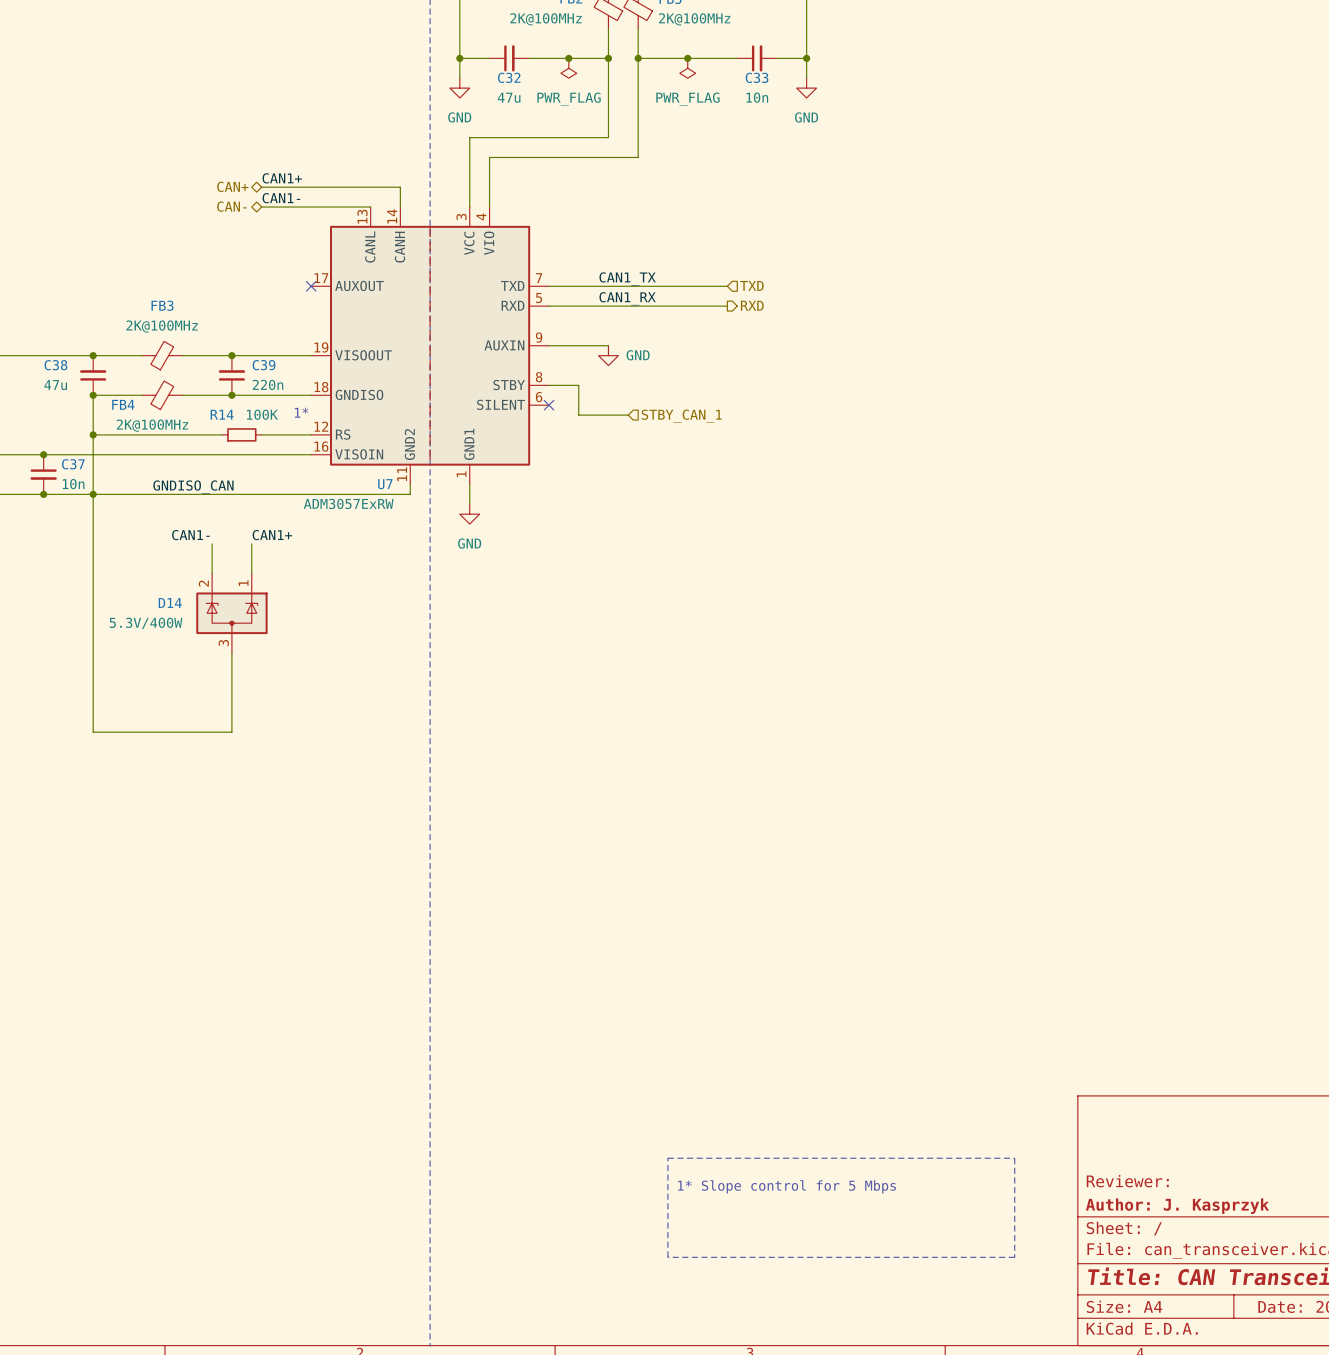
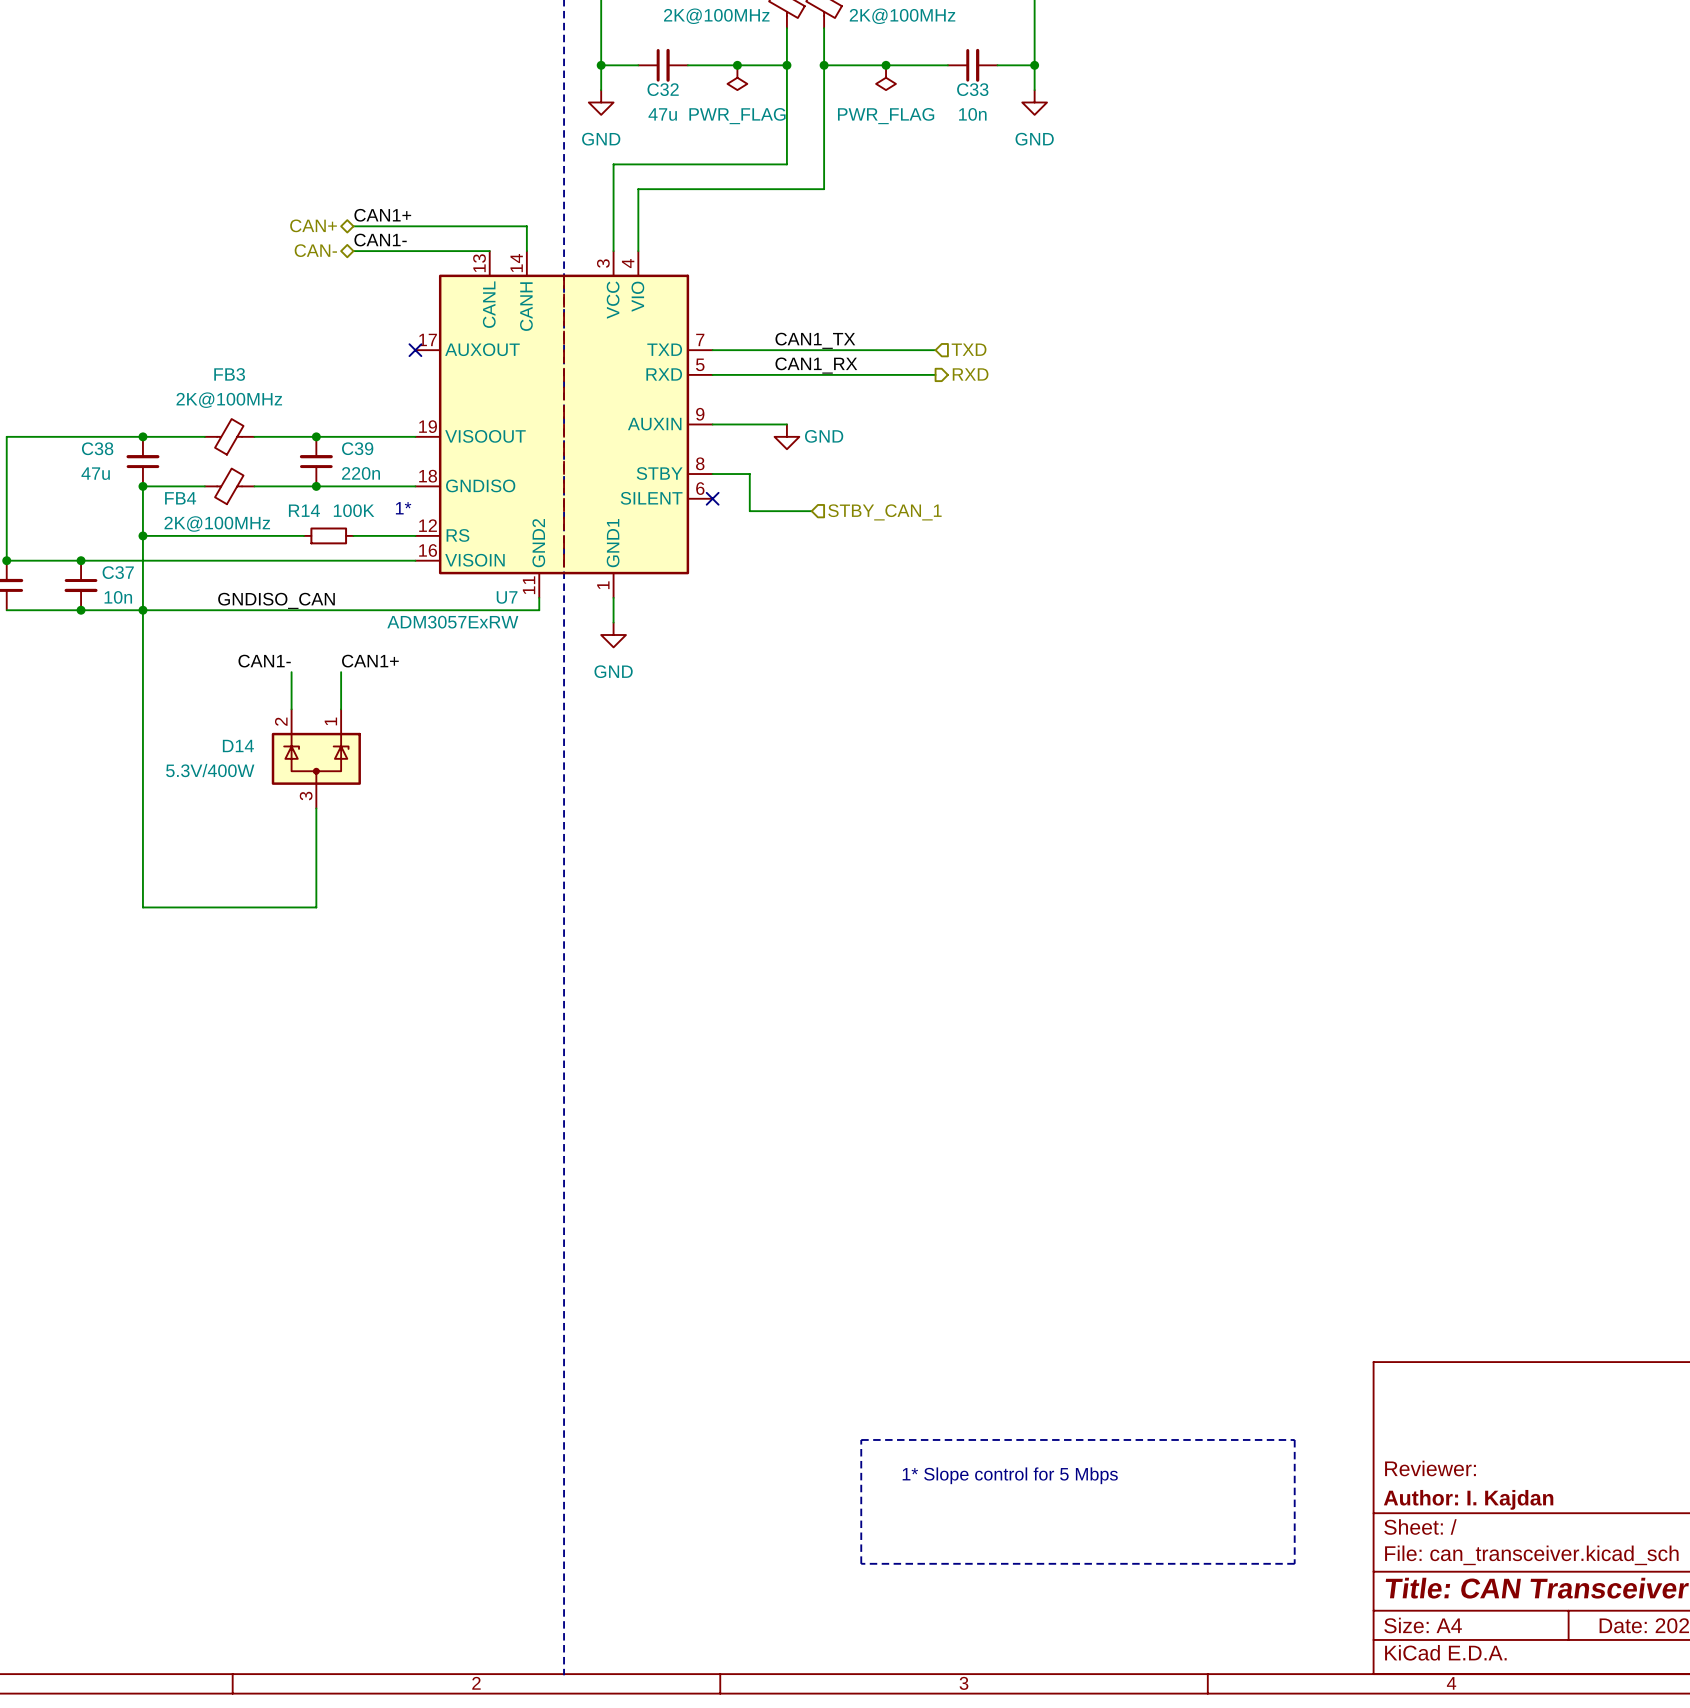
title block: Author: J. Kasprzyk (1177, 1206) -> Author: I. Kajdan (1468, 1499)

